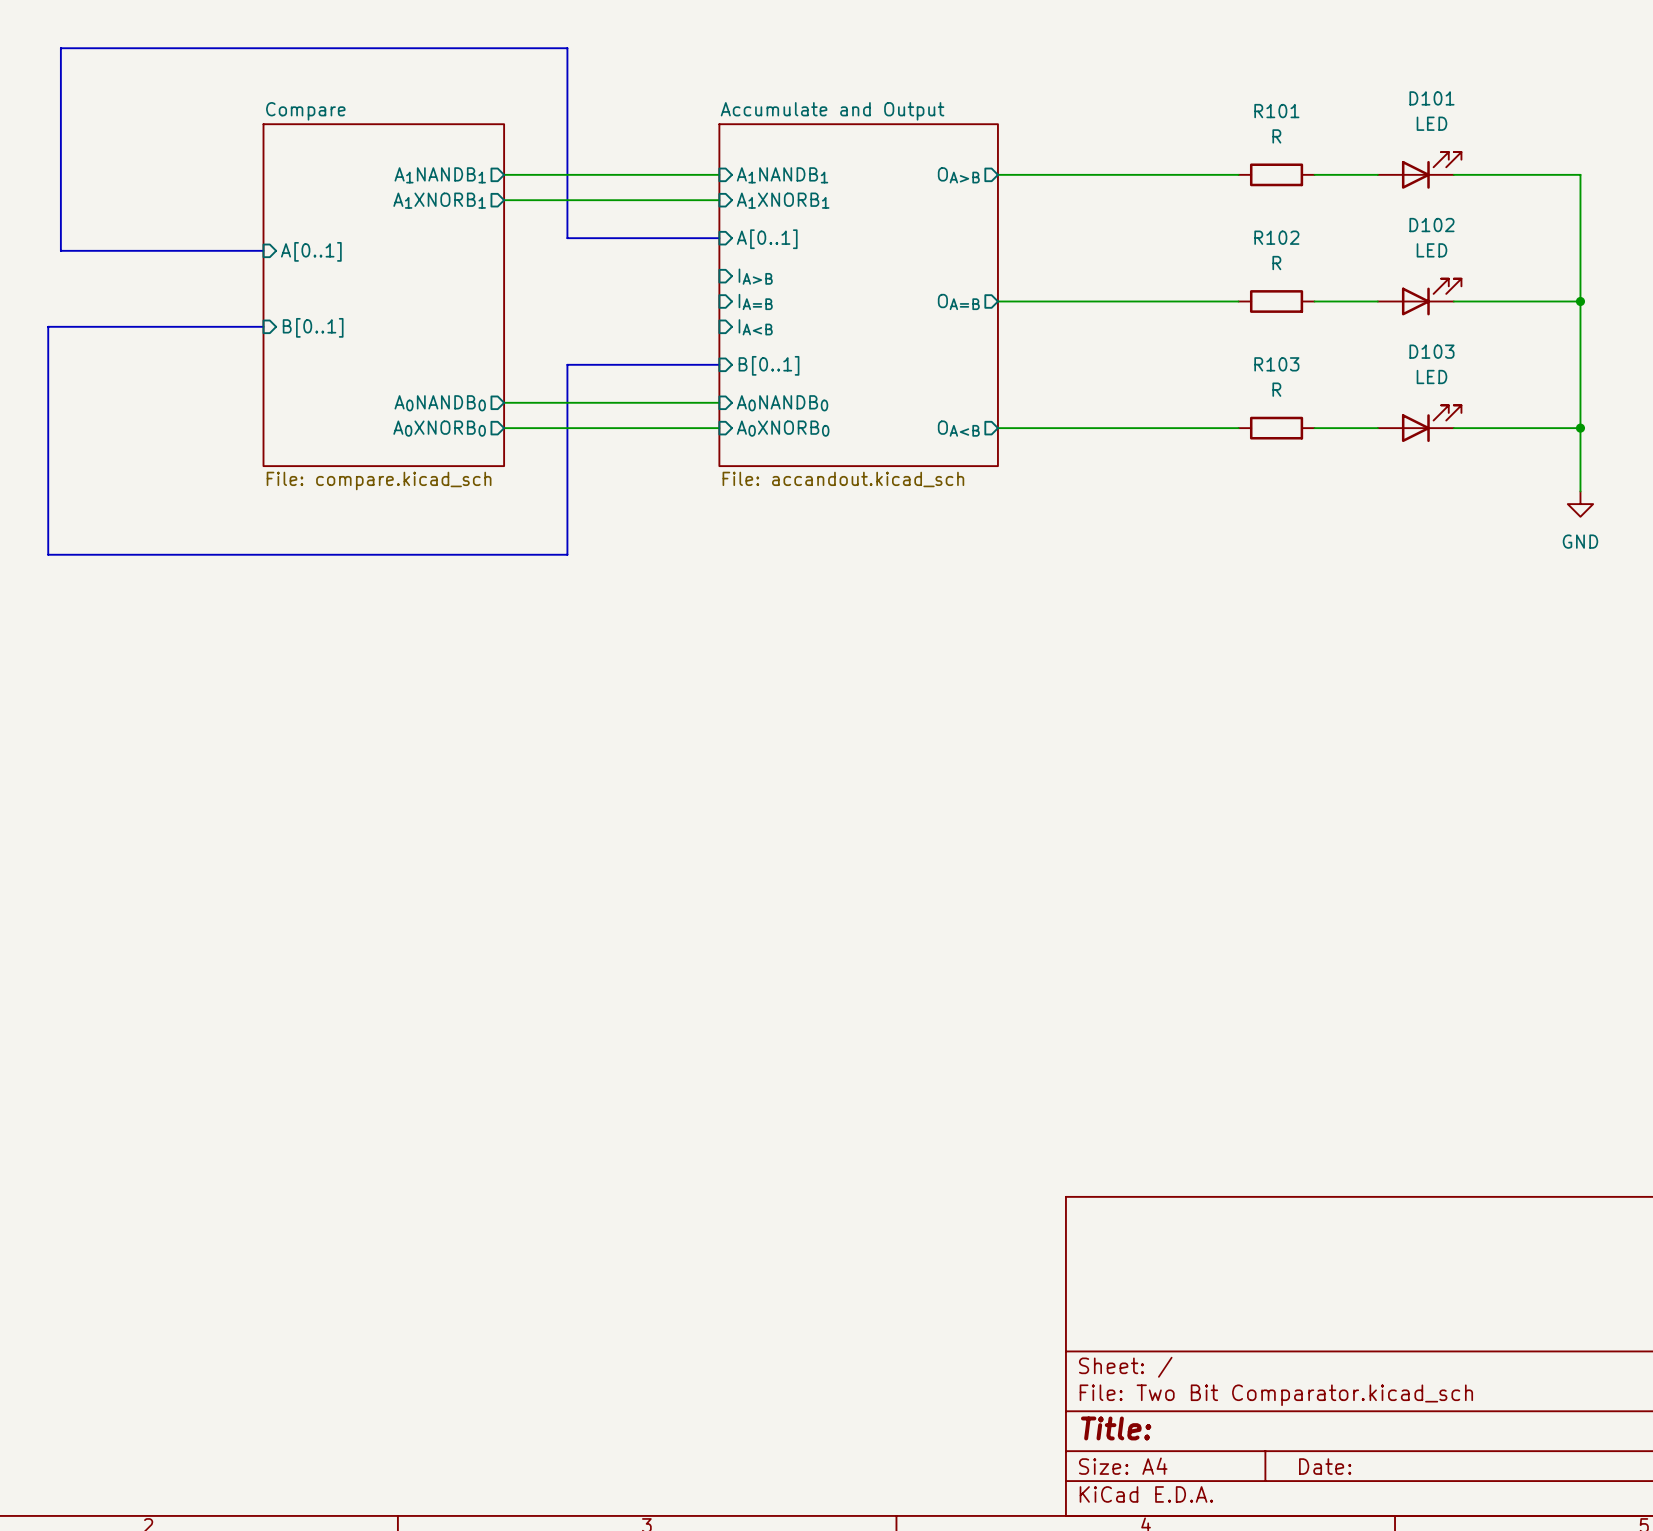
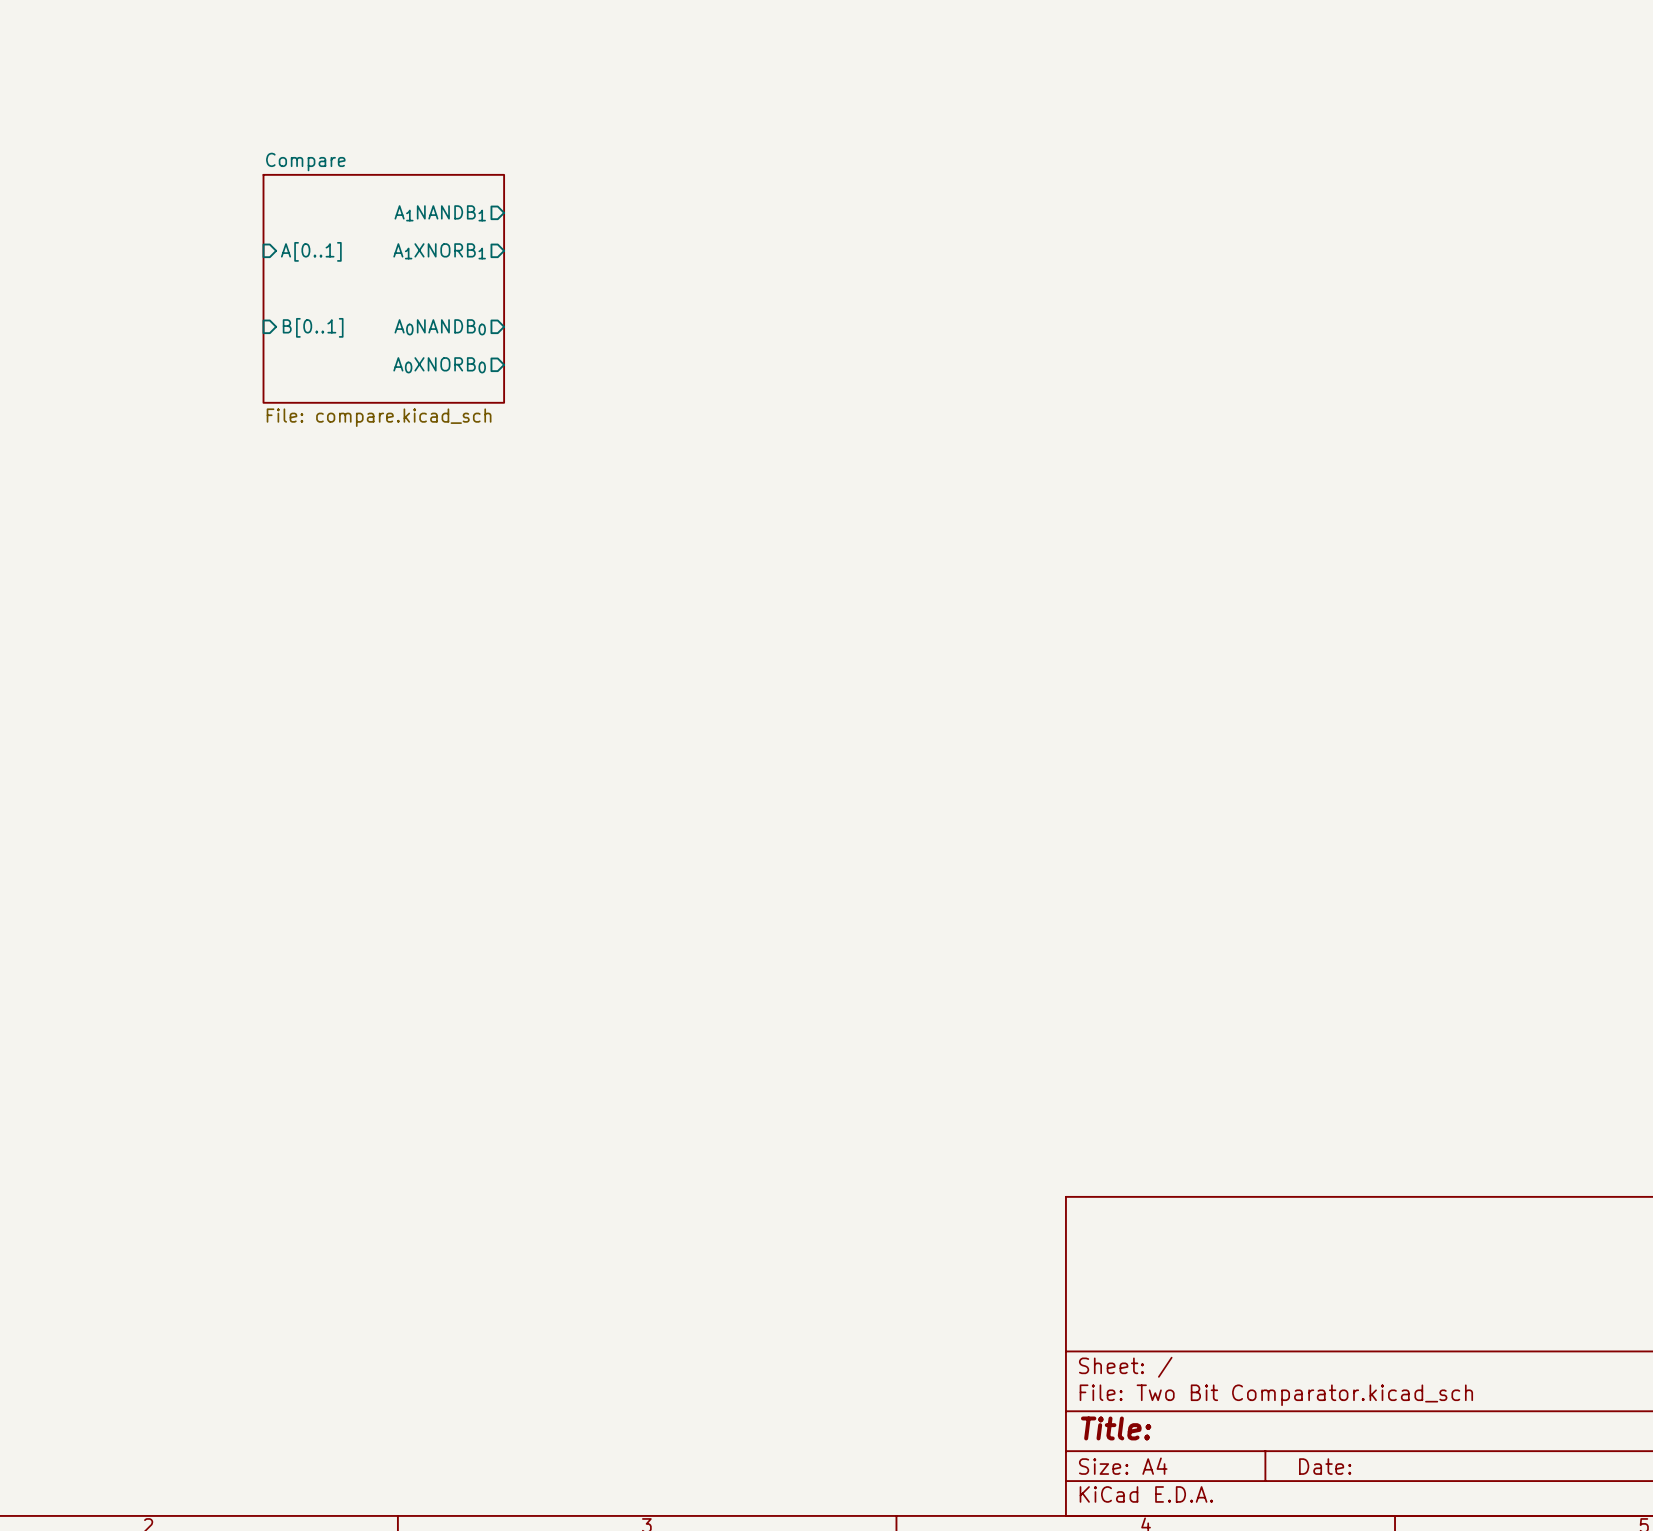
sheet Compare name position: Compare (305, 111) -> Compare (305, 161)
sheet Compare shape: [262, 123, 505, 467] -> [262, 174, 505, 404]
D101: LED (1419, 170) -> none
wire: (504, 174) (719, 174) -> none
wire: (997, 174) (1238, 174) -> none
R101: R (1276, 174) -> none
wire: (1314, 174) (1377, 174) -> none
wire: (1453, 174) (1580, 174) (1580, 491) -> none
sheet pin position: A1NANDB1 (440, 175) -> A1NANDB1 (440, 213)
sheet pin: A1NANDB1 (782, 175) -> none
sheet pin: OA>B (958, 175) -> none
sheet pin position: A1XNORB1 (439, 200) -> A1XNORB1 (439, 251)
wire: (504, 200) (719, 200) -> none
sheet pin: A1XNORB1 (783, 200) -> none
bus: (719, 238) (567, 238) (567, 48) (60, 48) (60, 250) (263, 250) -> none
sheet pin: A[0..1] (767, 239) -> none
sheet pin: IA>B (755, 276) -> none
sheet Accumulate and Output: File: accandout.kicad_sch (858, 295) -> none
D102: LED (1419, 297) -> none
sheet pin: IA=B (755, 301) -> none
sheet pin: OA=B (958, 301) -> none
wire: (997, 301) (1238, 301) -> none
R102: R (1276, 301) -> none
wire: (1314, 301) (1377, 301) -> none
wire: (1453, 301) (1580, 301) -> none
junction: (1580, 301) -> none
bus: (263, 326) (48, 326) (48, 554) (567, 554) (567, 364) (719, 364) -> none
sheet pin: IA<B (755, 327) -> none
sheet pin: B[0..1] (769, 365) -> none
wire: (504, 402) (719, 402) -> none
sheet pin position: A0NANDB0 (440, 403) -> A0NANDB0 (440, 327)
sheet pin: A0NANDB0 (782, 403) -> none
D103: LED (1419, 423) -> none
sheet pin position: A0XNORB0 (439, 428) -> A0XNORB0 (439, 365)
wire: (504, 428) (719, 428) -> none
sheet pin: A0XNORB0 (783, 428) -> none
sheet pin: OA<B (958, 428) -> none
wire: (997, 428) (1238, 428) -> none
R103: R (1276, 428) -> none
wire: (1314, 428) (1377, 428) -> none
wire: (1453, 428) (1580, 428) -> none
junction: (1580, 428) -> none
sheet Compare value position: File: compare.kicad_sch (379, 480) -> File: compare.kicad_sch (379, 417)
power symbol: GND (1580, 504) -> none

